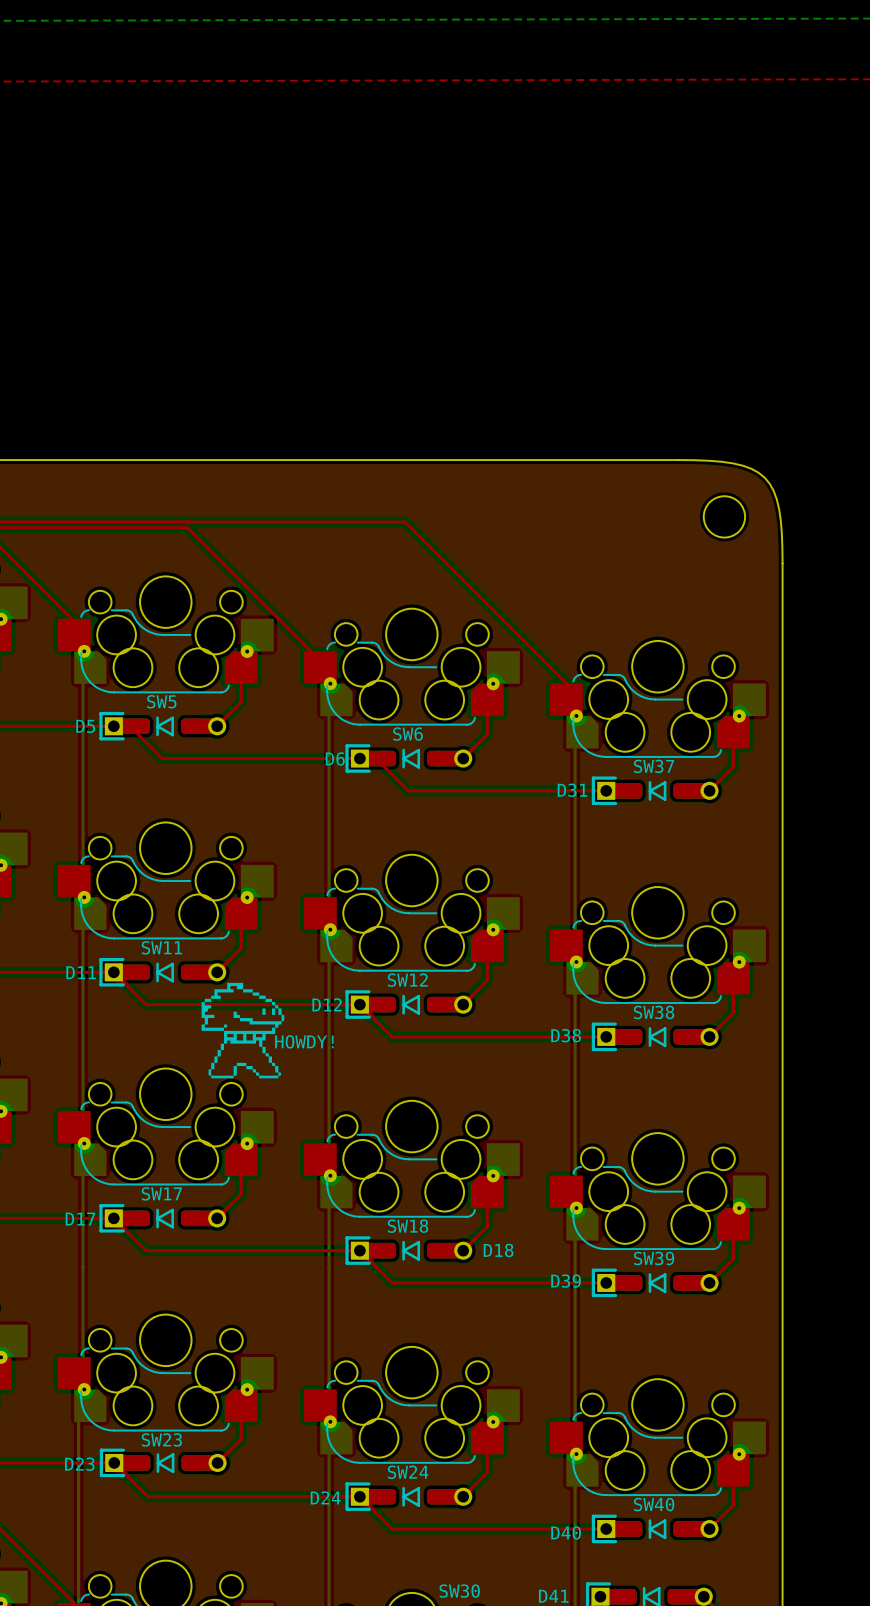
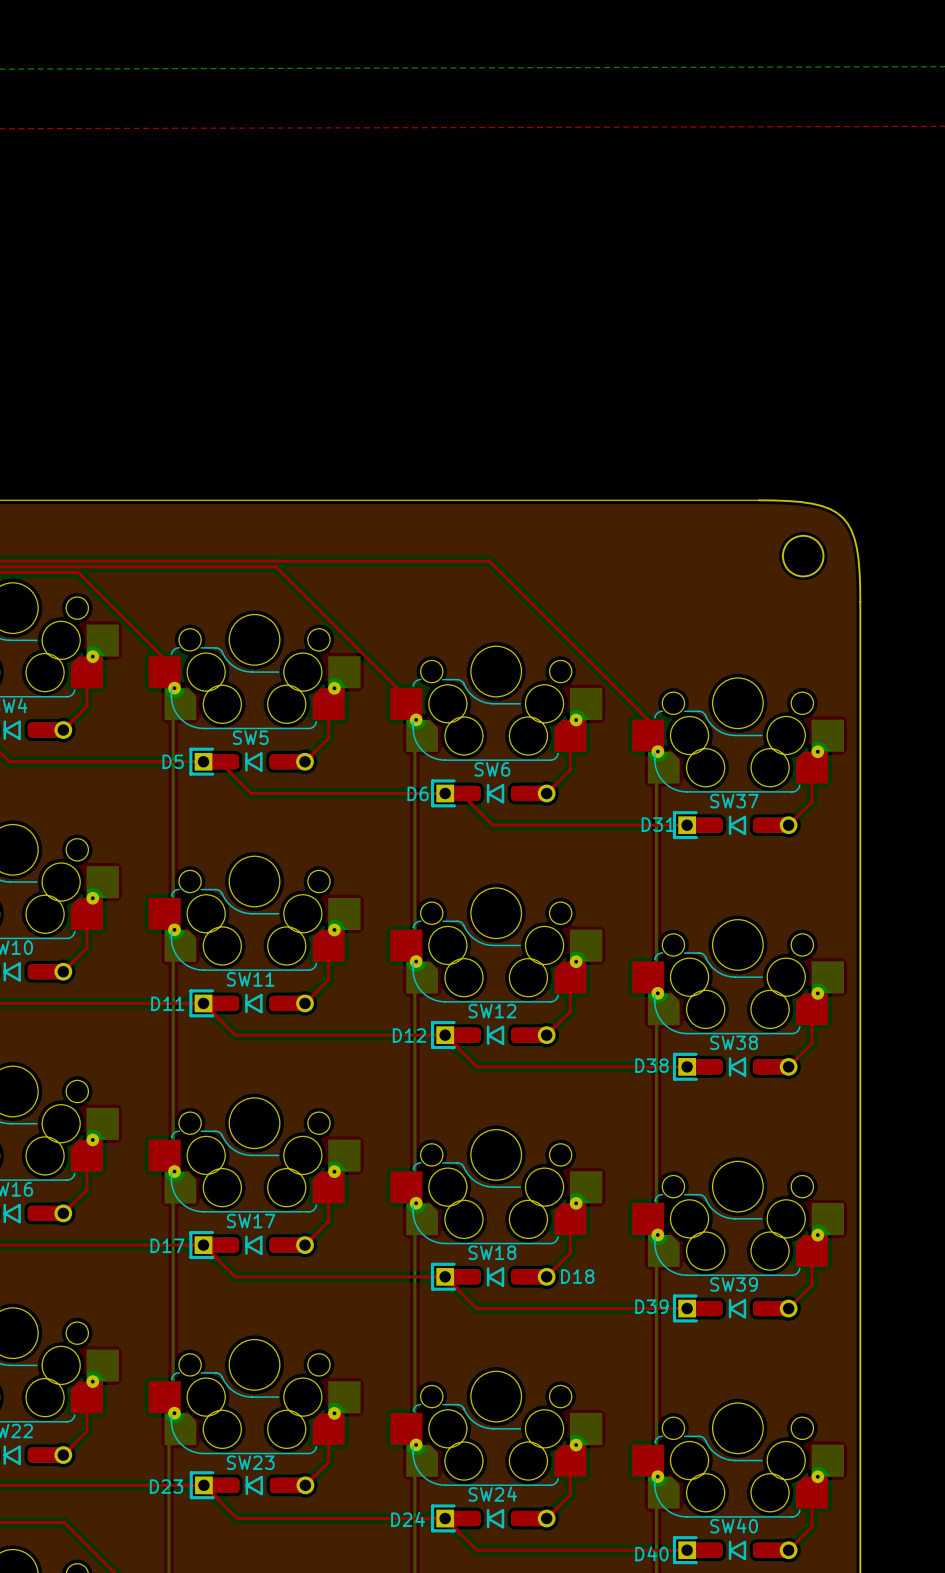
drawing: [201, 982, 285, 1079] -> none
text: HOWDY! (304, 1041) -> none

